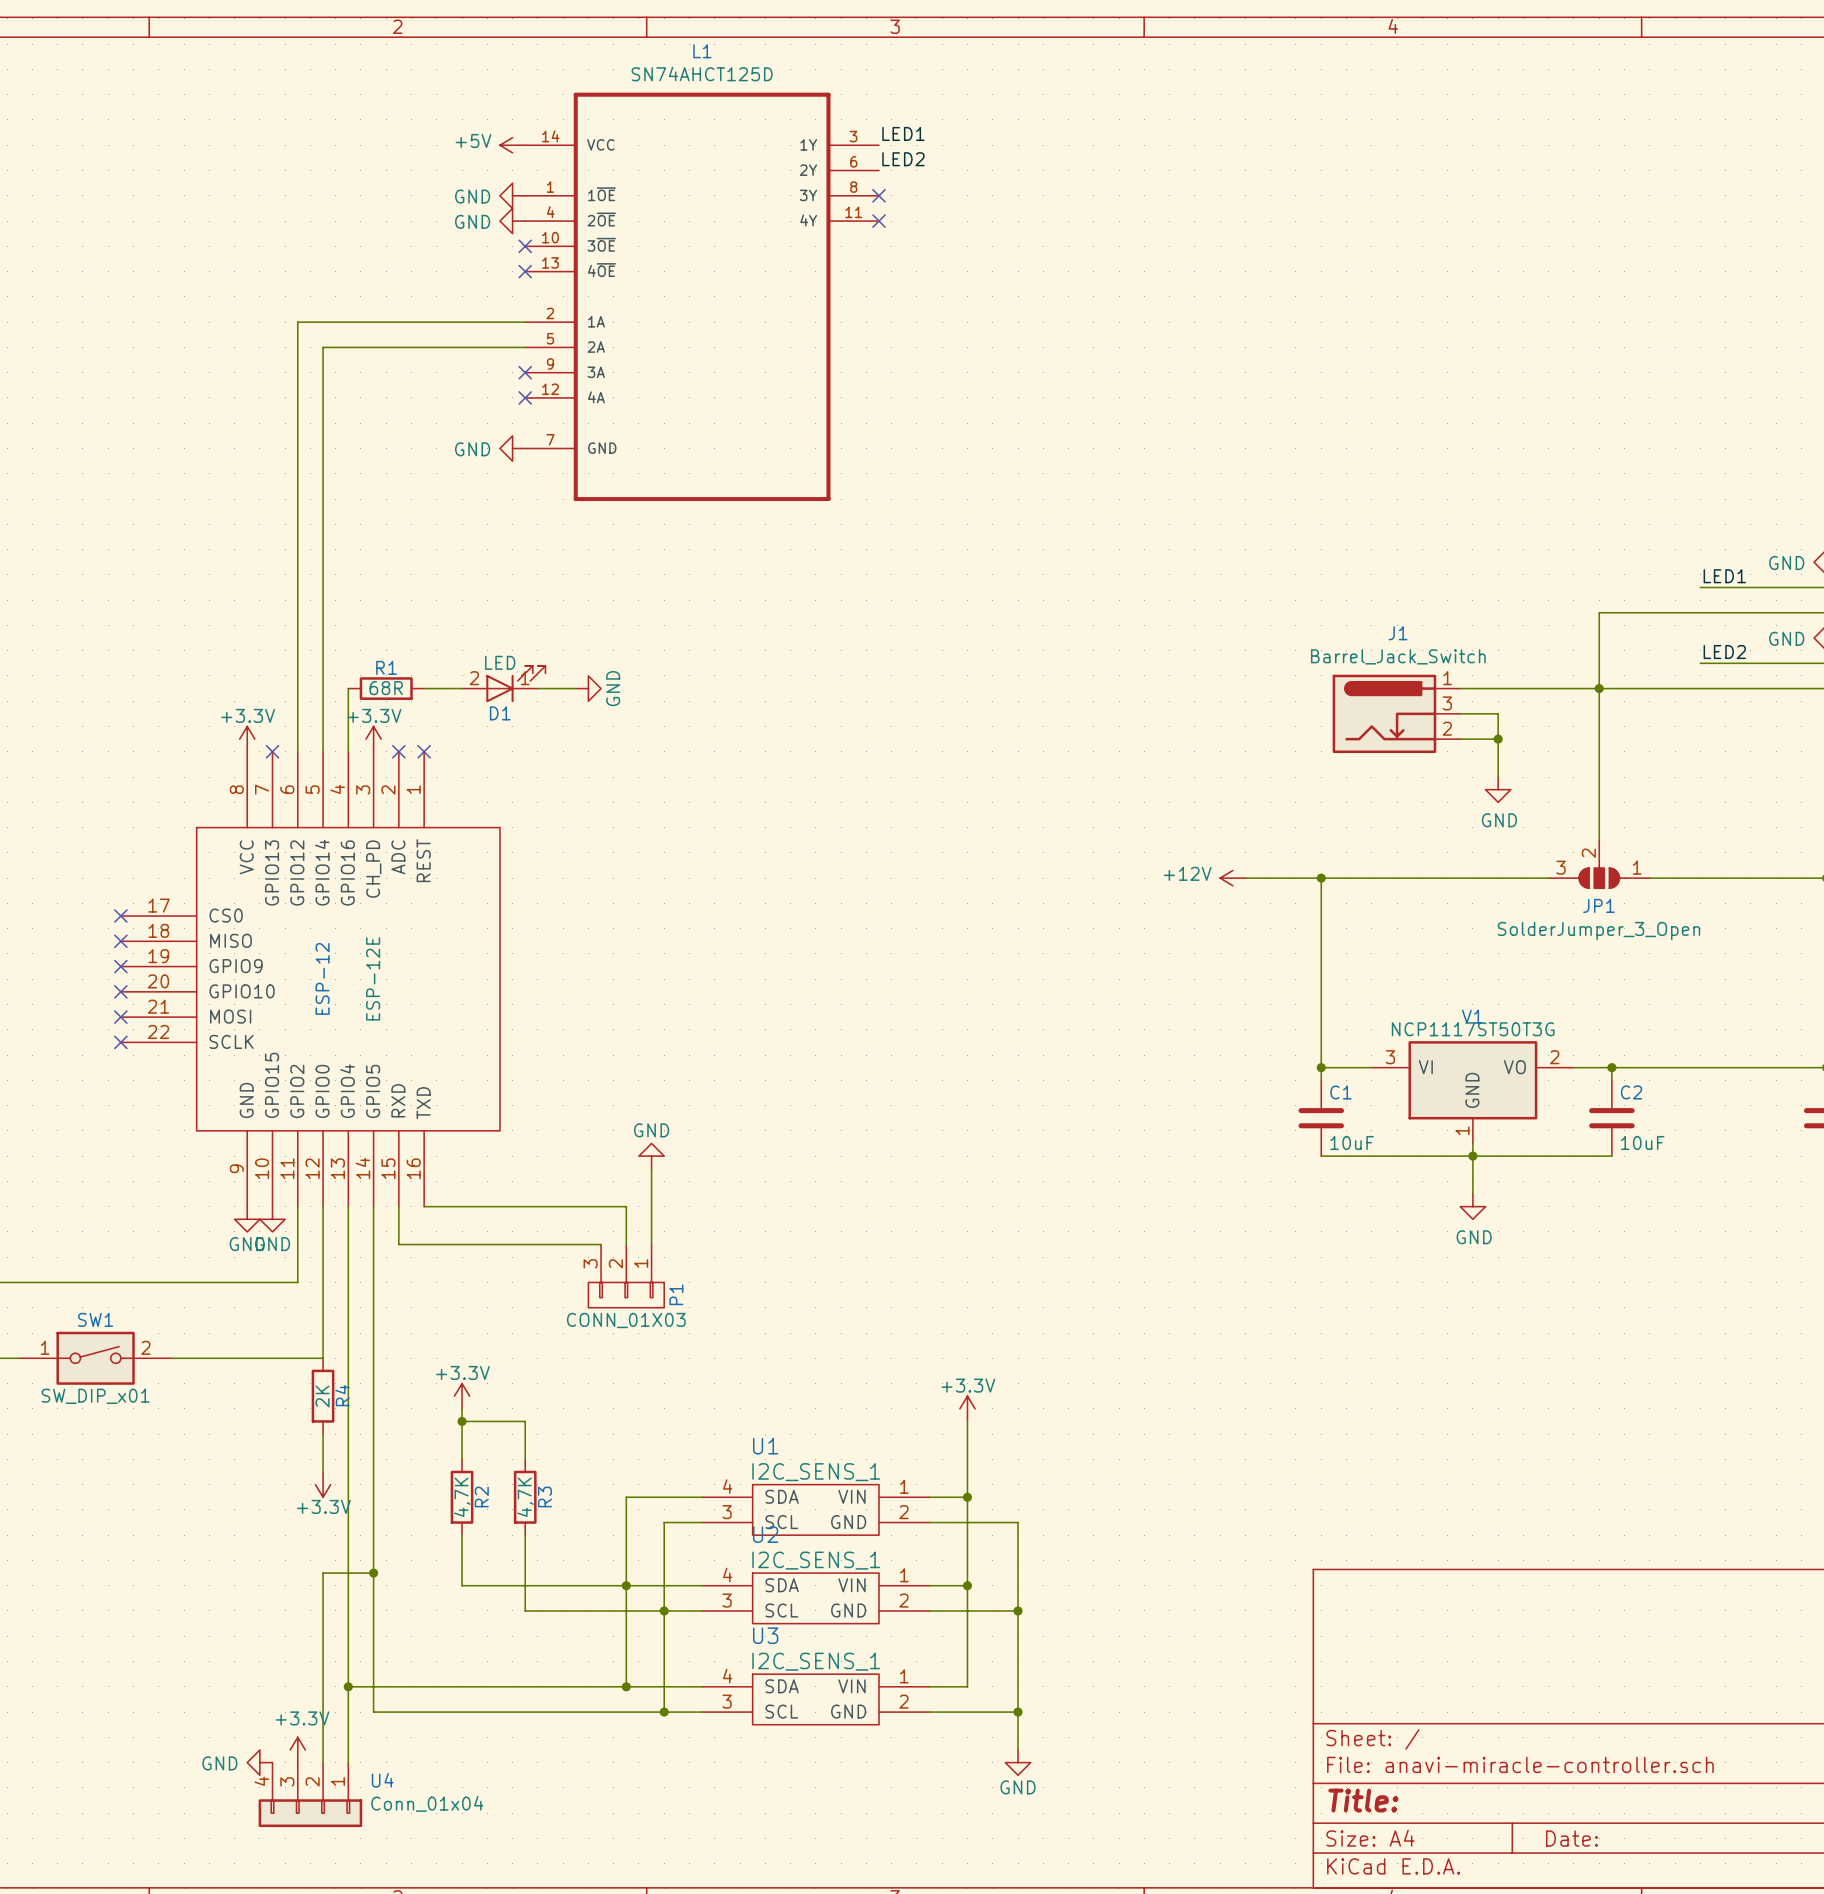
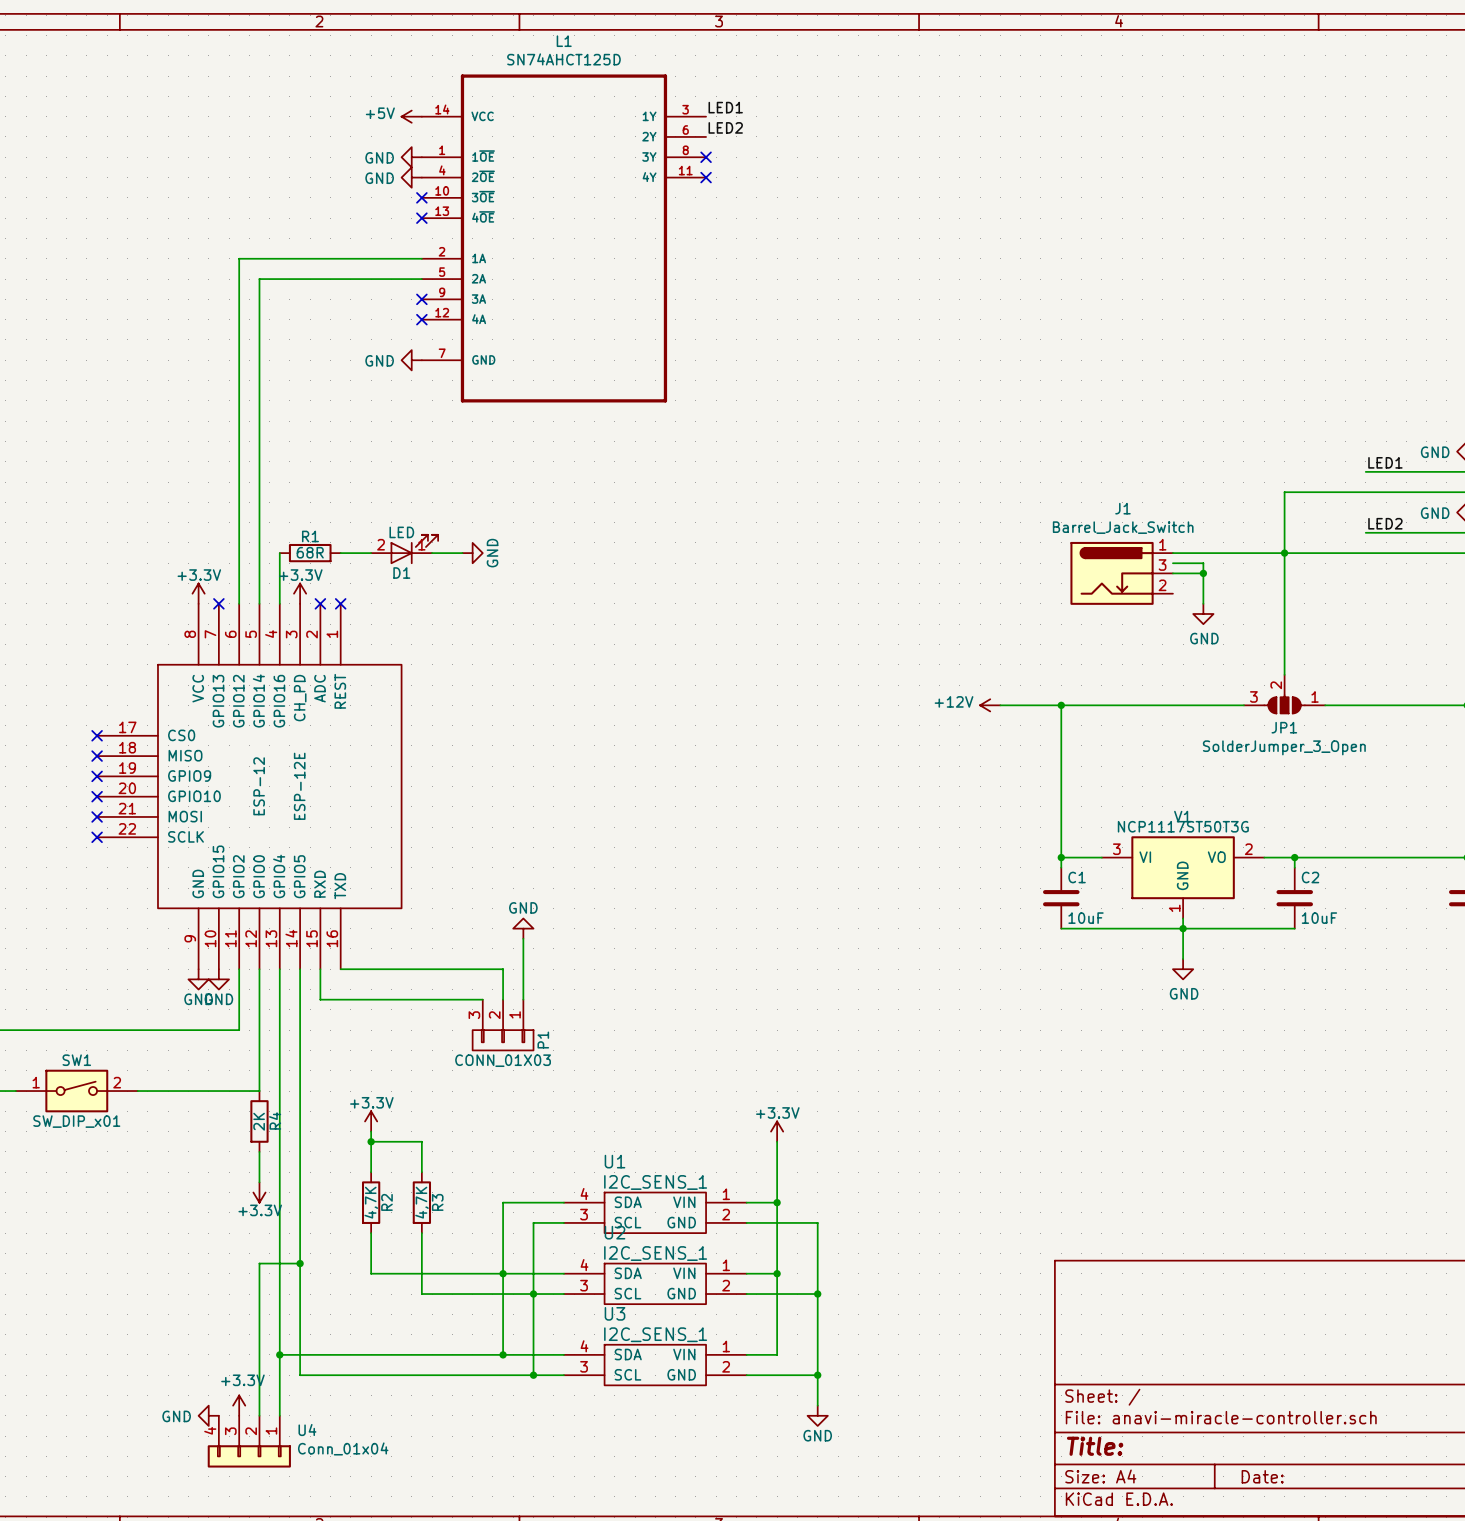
wire: none -> (1172, 563) (1203, 563) (1203, 573)
wire: (1460, 739) (1498, 739) -> none
junction position: (1498, 739) -> (1203, 573)
power symbol position: GND (1498, 789) -> GND (1203, 613)

